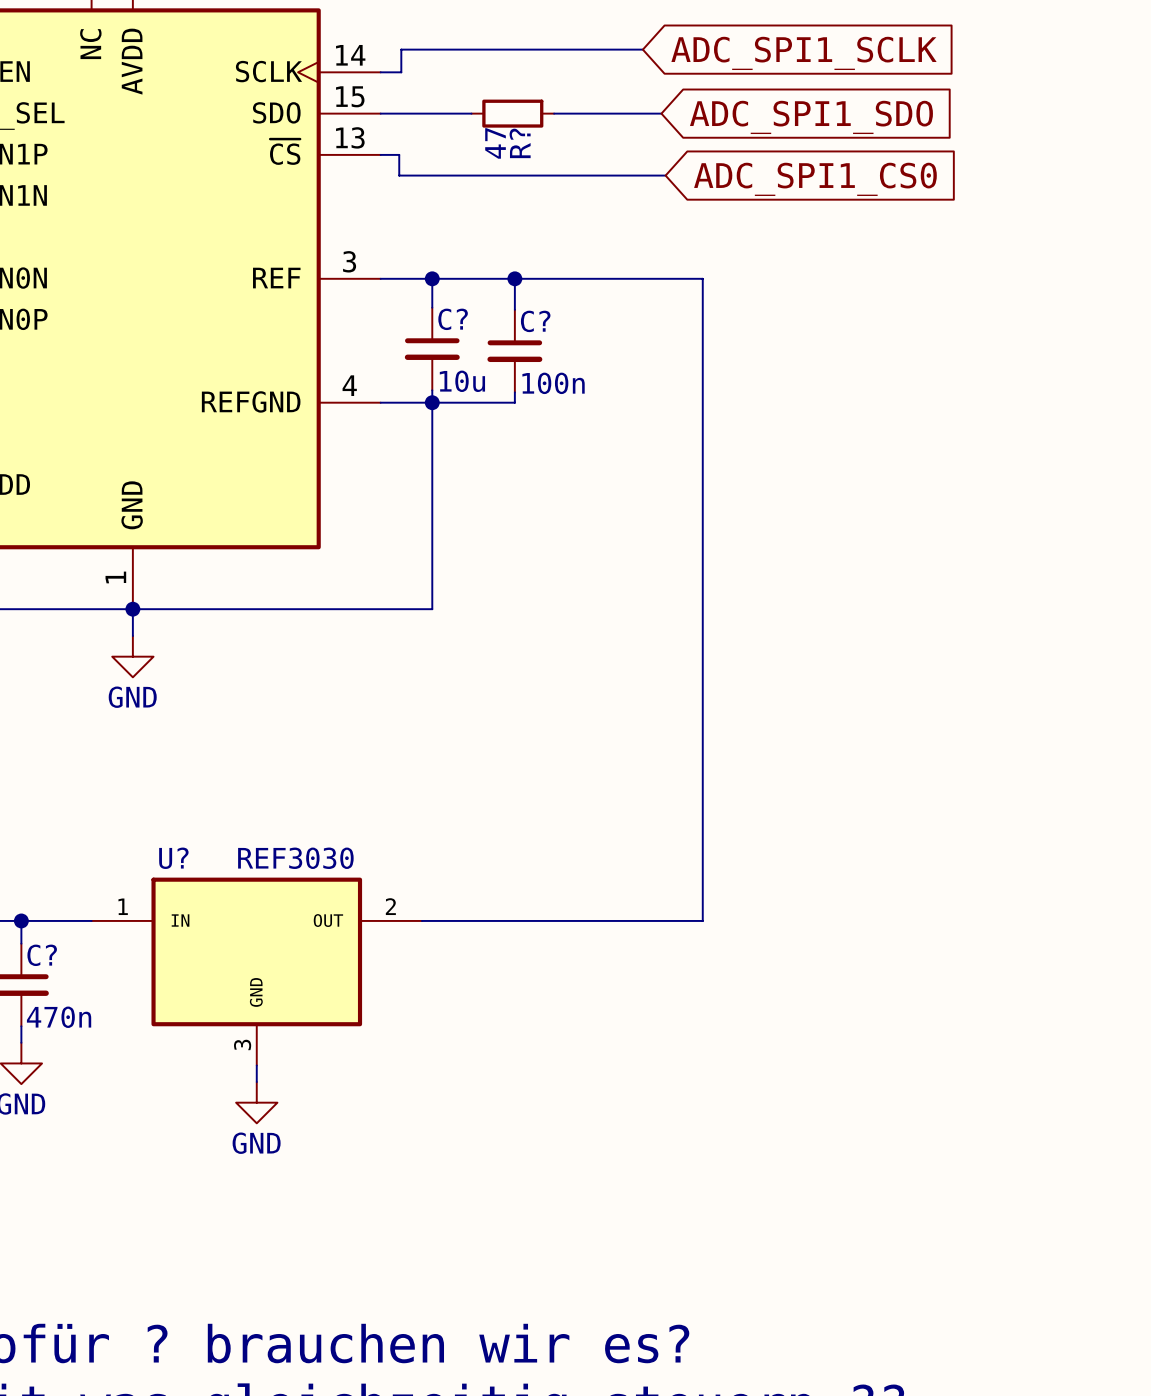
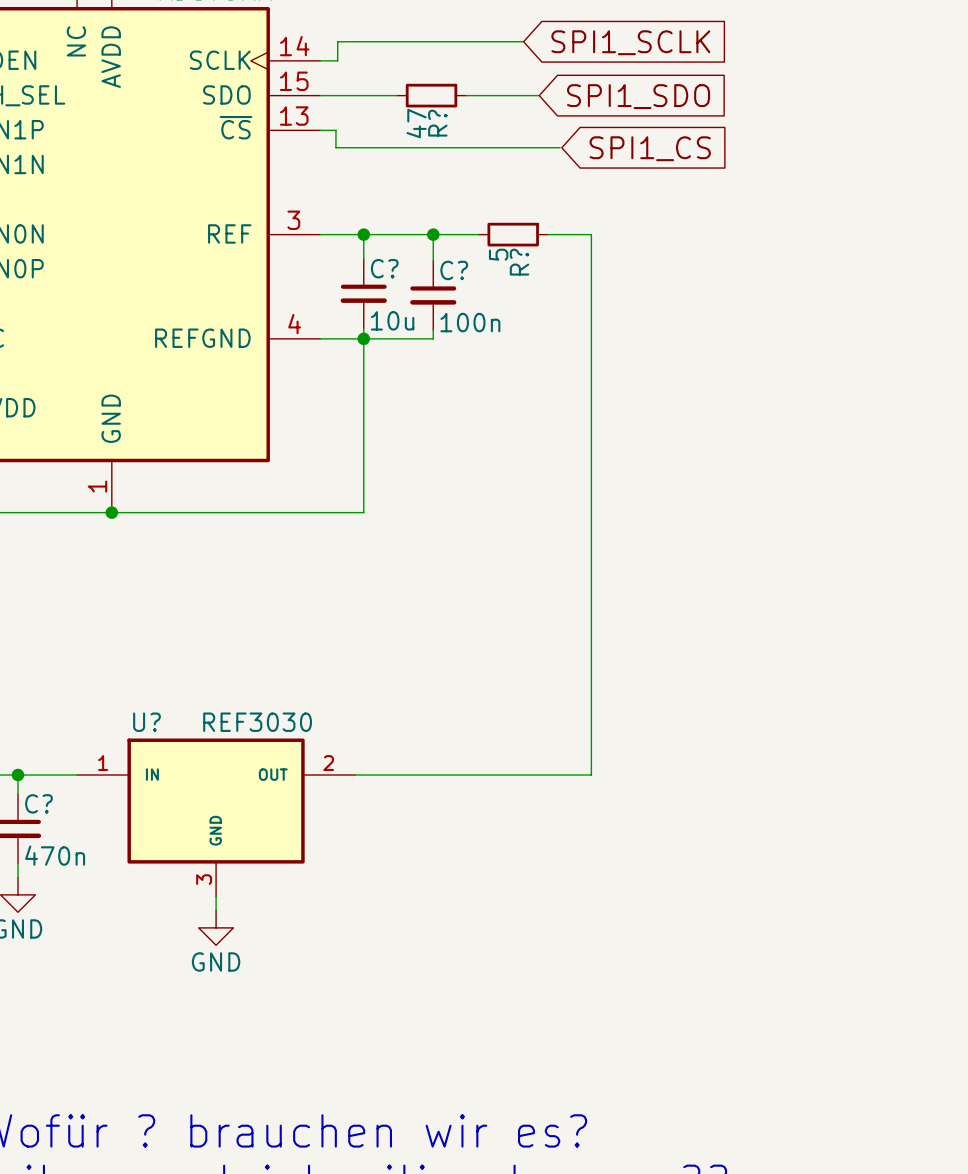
wire: (622, 49) (642, 49) -> none
global label: ADC_SPI1_SCLK (804, 53) -> SPI1_SCLK (630, 42)
wire: (640, 113) (661, 113) -> none
global label: ADC_SPI1_SDO (811, 117) -> SPI1_SDO (638, 96)
global label: ADC_SPI1_CS0 (815, 179) -> SPI1_CS (650, 148)
wire: (568, 278) (651, 278) -> none
R?: none -> 5 (513, 234)
wire: (132, 609) (132, 636) -> none
power symbol: GND (132, 656) -> none

